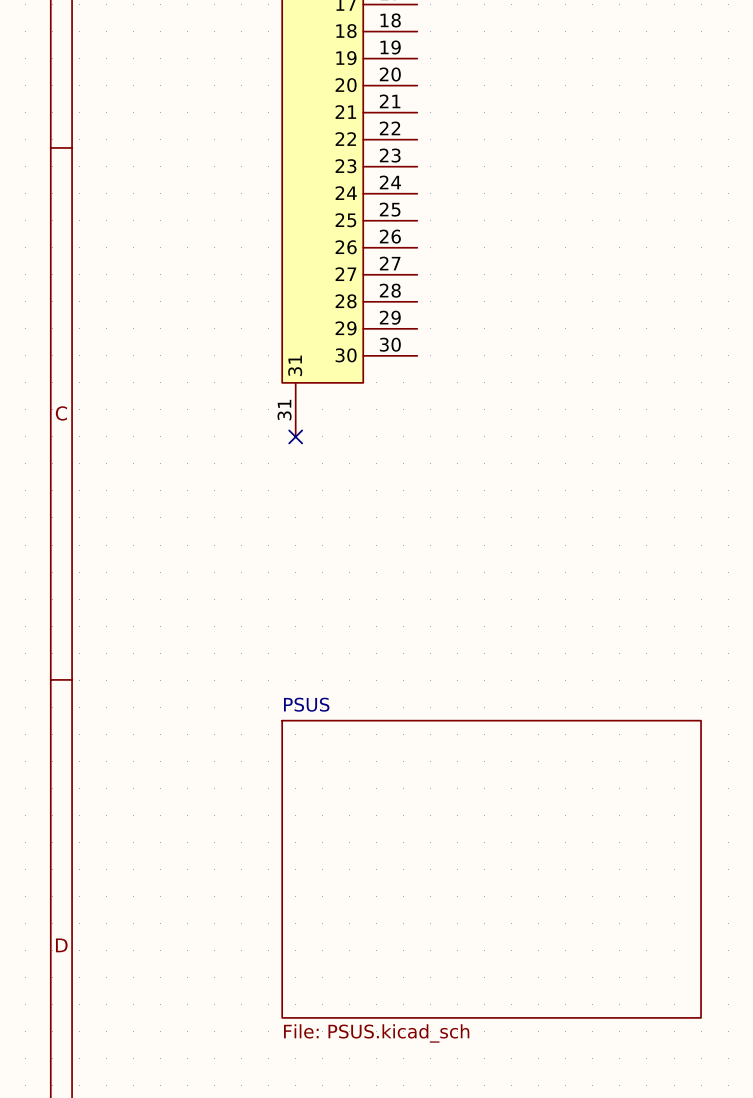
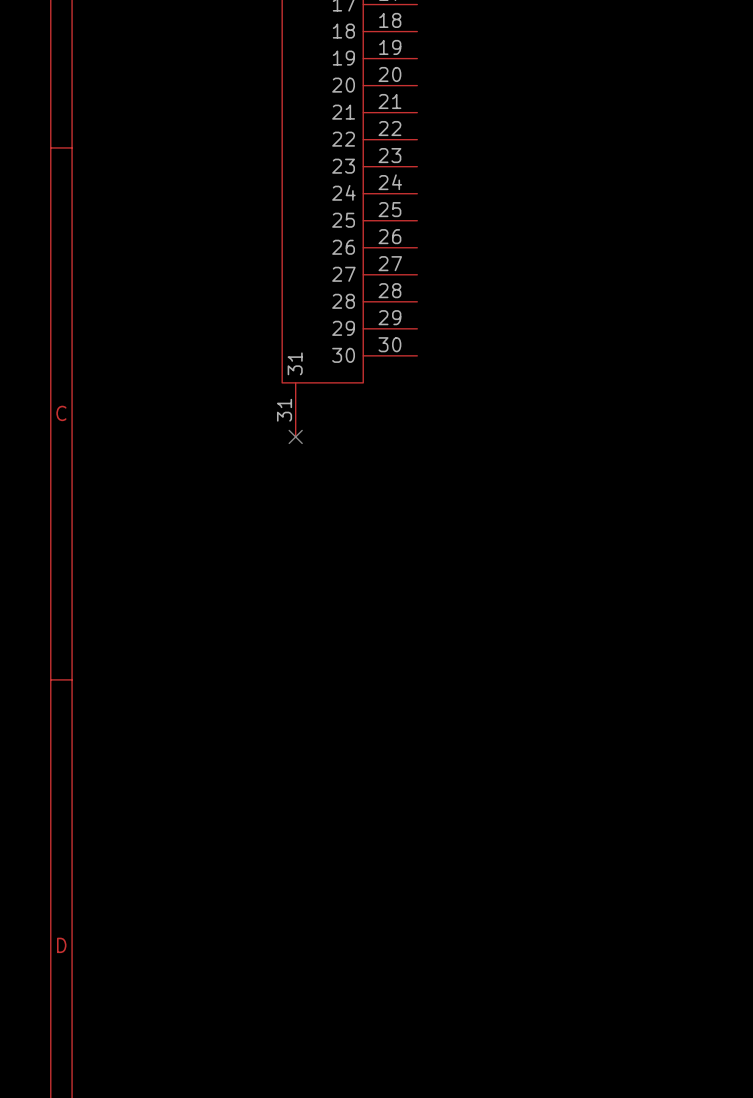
sheet PSUS: File: PSUS.kicad_sch (491, 869) -> none

